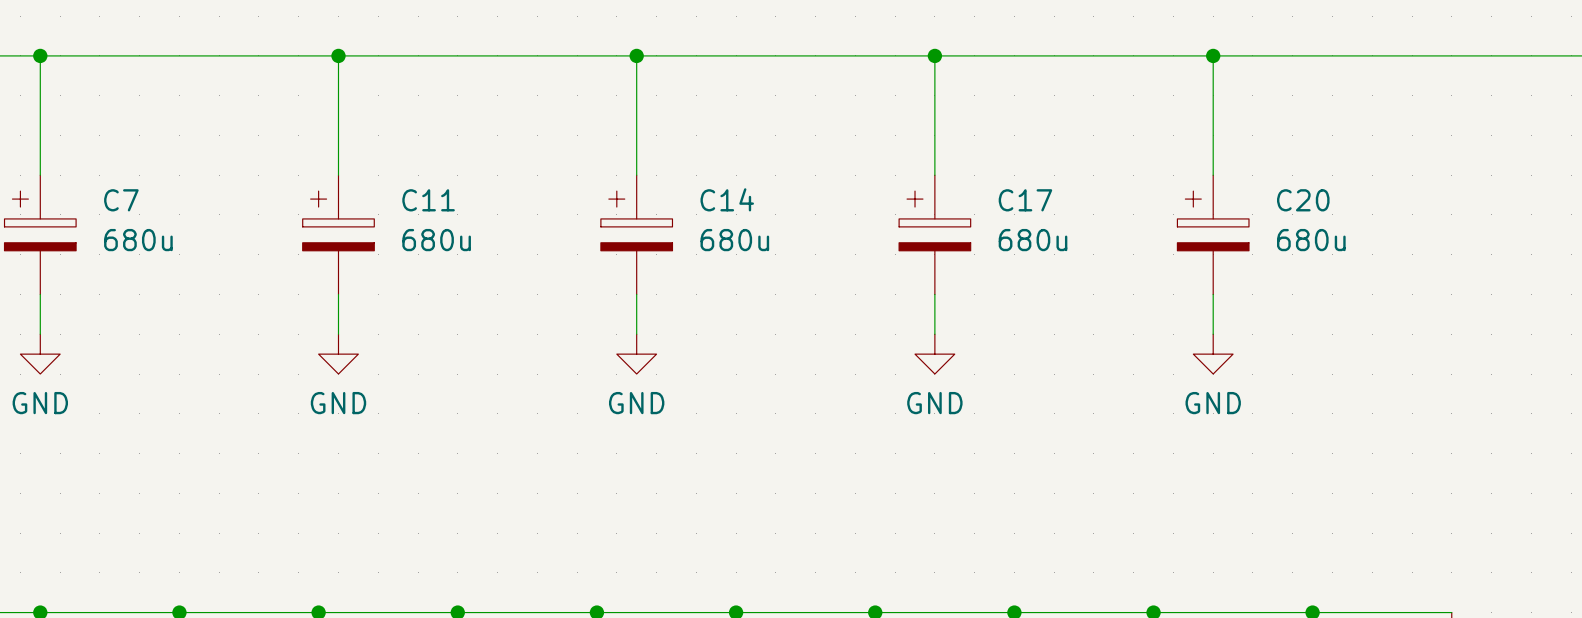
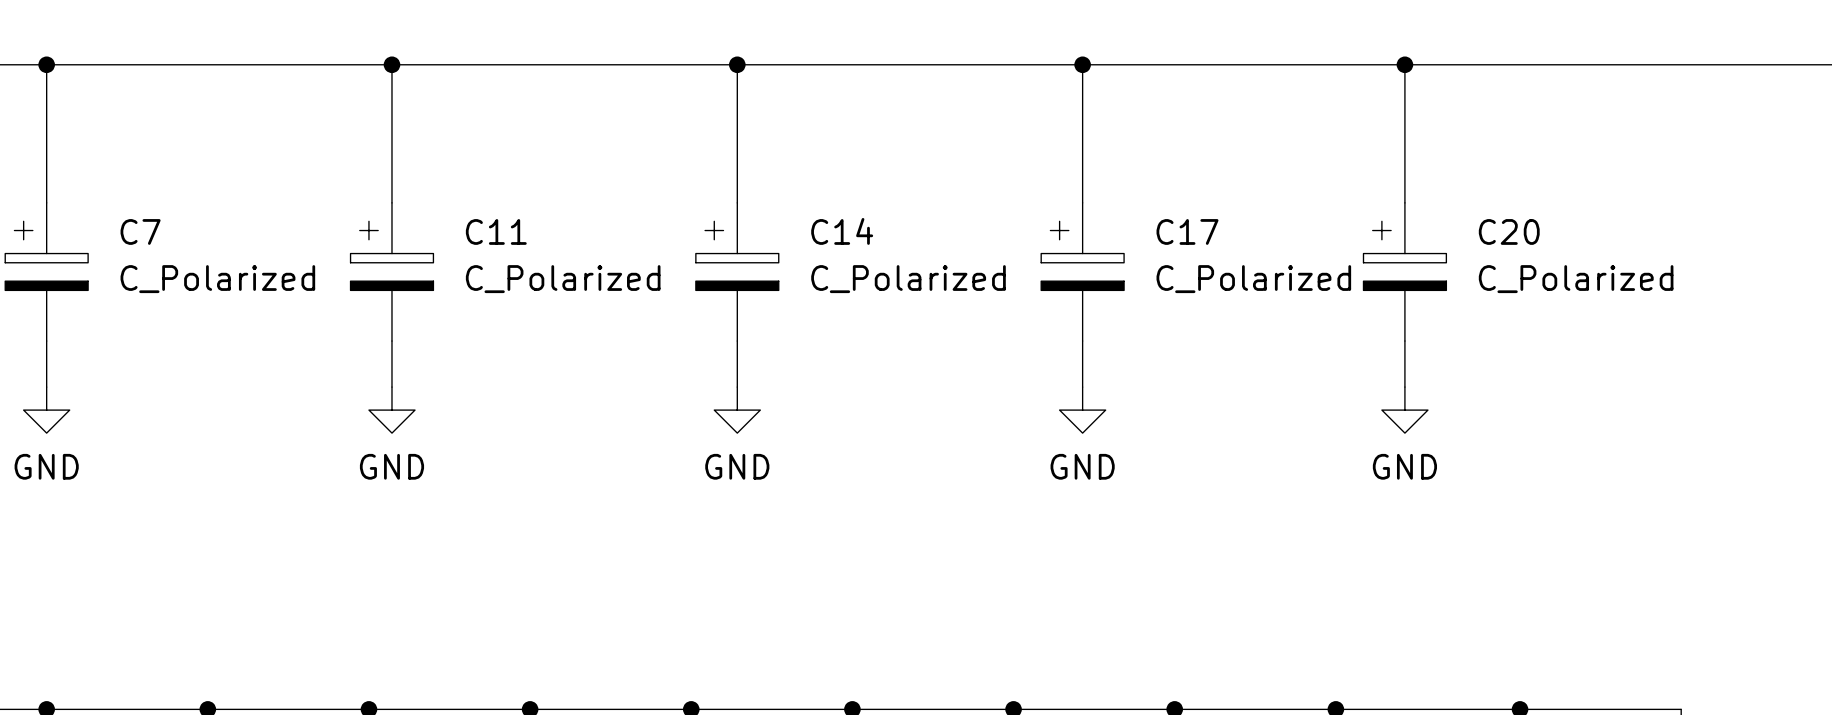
C7 value: 680u (138, 240) -> C_Polarized (217, 279)
C11 value: 680u (436, 240) -> C_Polarized (563, 279)
C14 value: 680u (734, 240) -> C_Polarized (908, 279)
C17 value: 680u (1033, 240) -> C_Polarized (1253, 279)
C20 value: 680u (1311, 240) -> C_Polarized (1576, 279)

